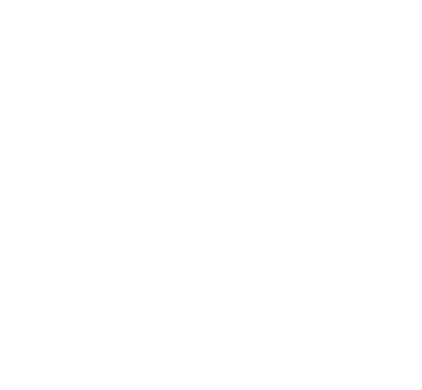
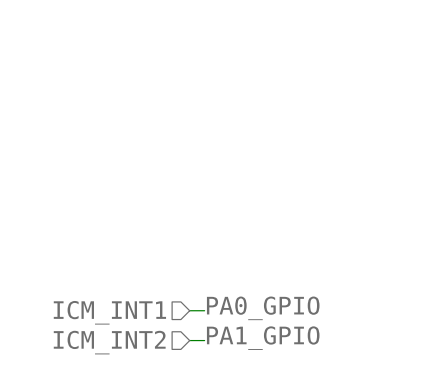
label: none -> PA0_GPIO (263, 308)
wire: none -> (189, 310) (204, 310)
sheet pin: none -> ICM_INT1 (109, 312)
label: none -> PA1_GPIO (263, 338)
wire: none -> (189, 340) (204, 340)
sheet pin: none -> ICM_INT2 (109, 342)

